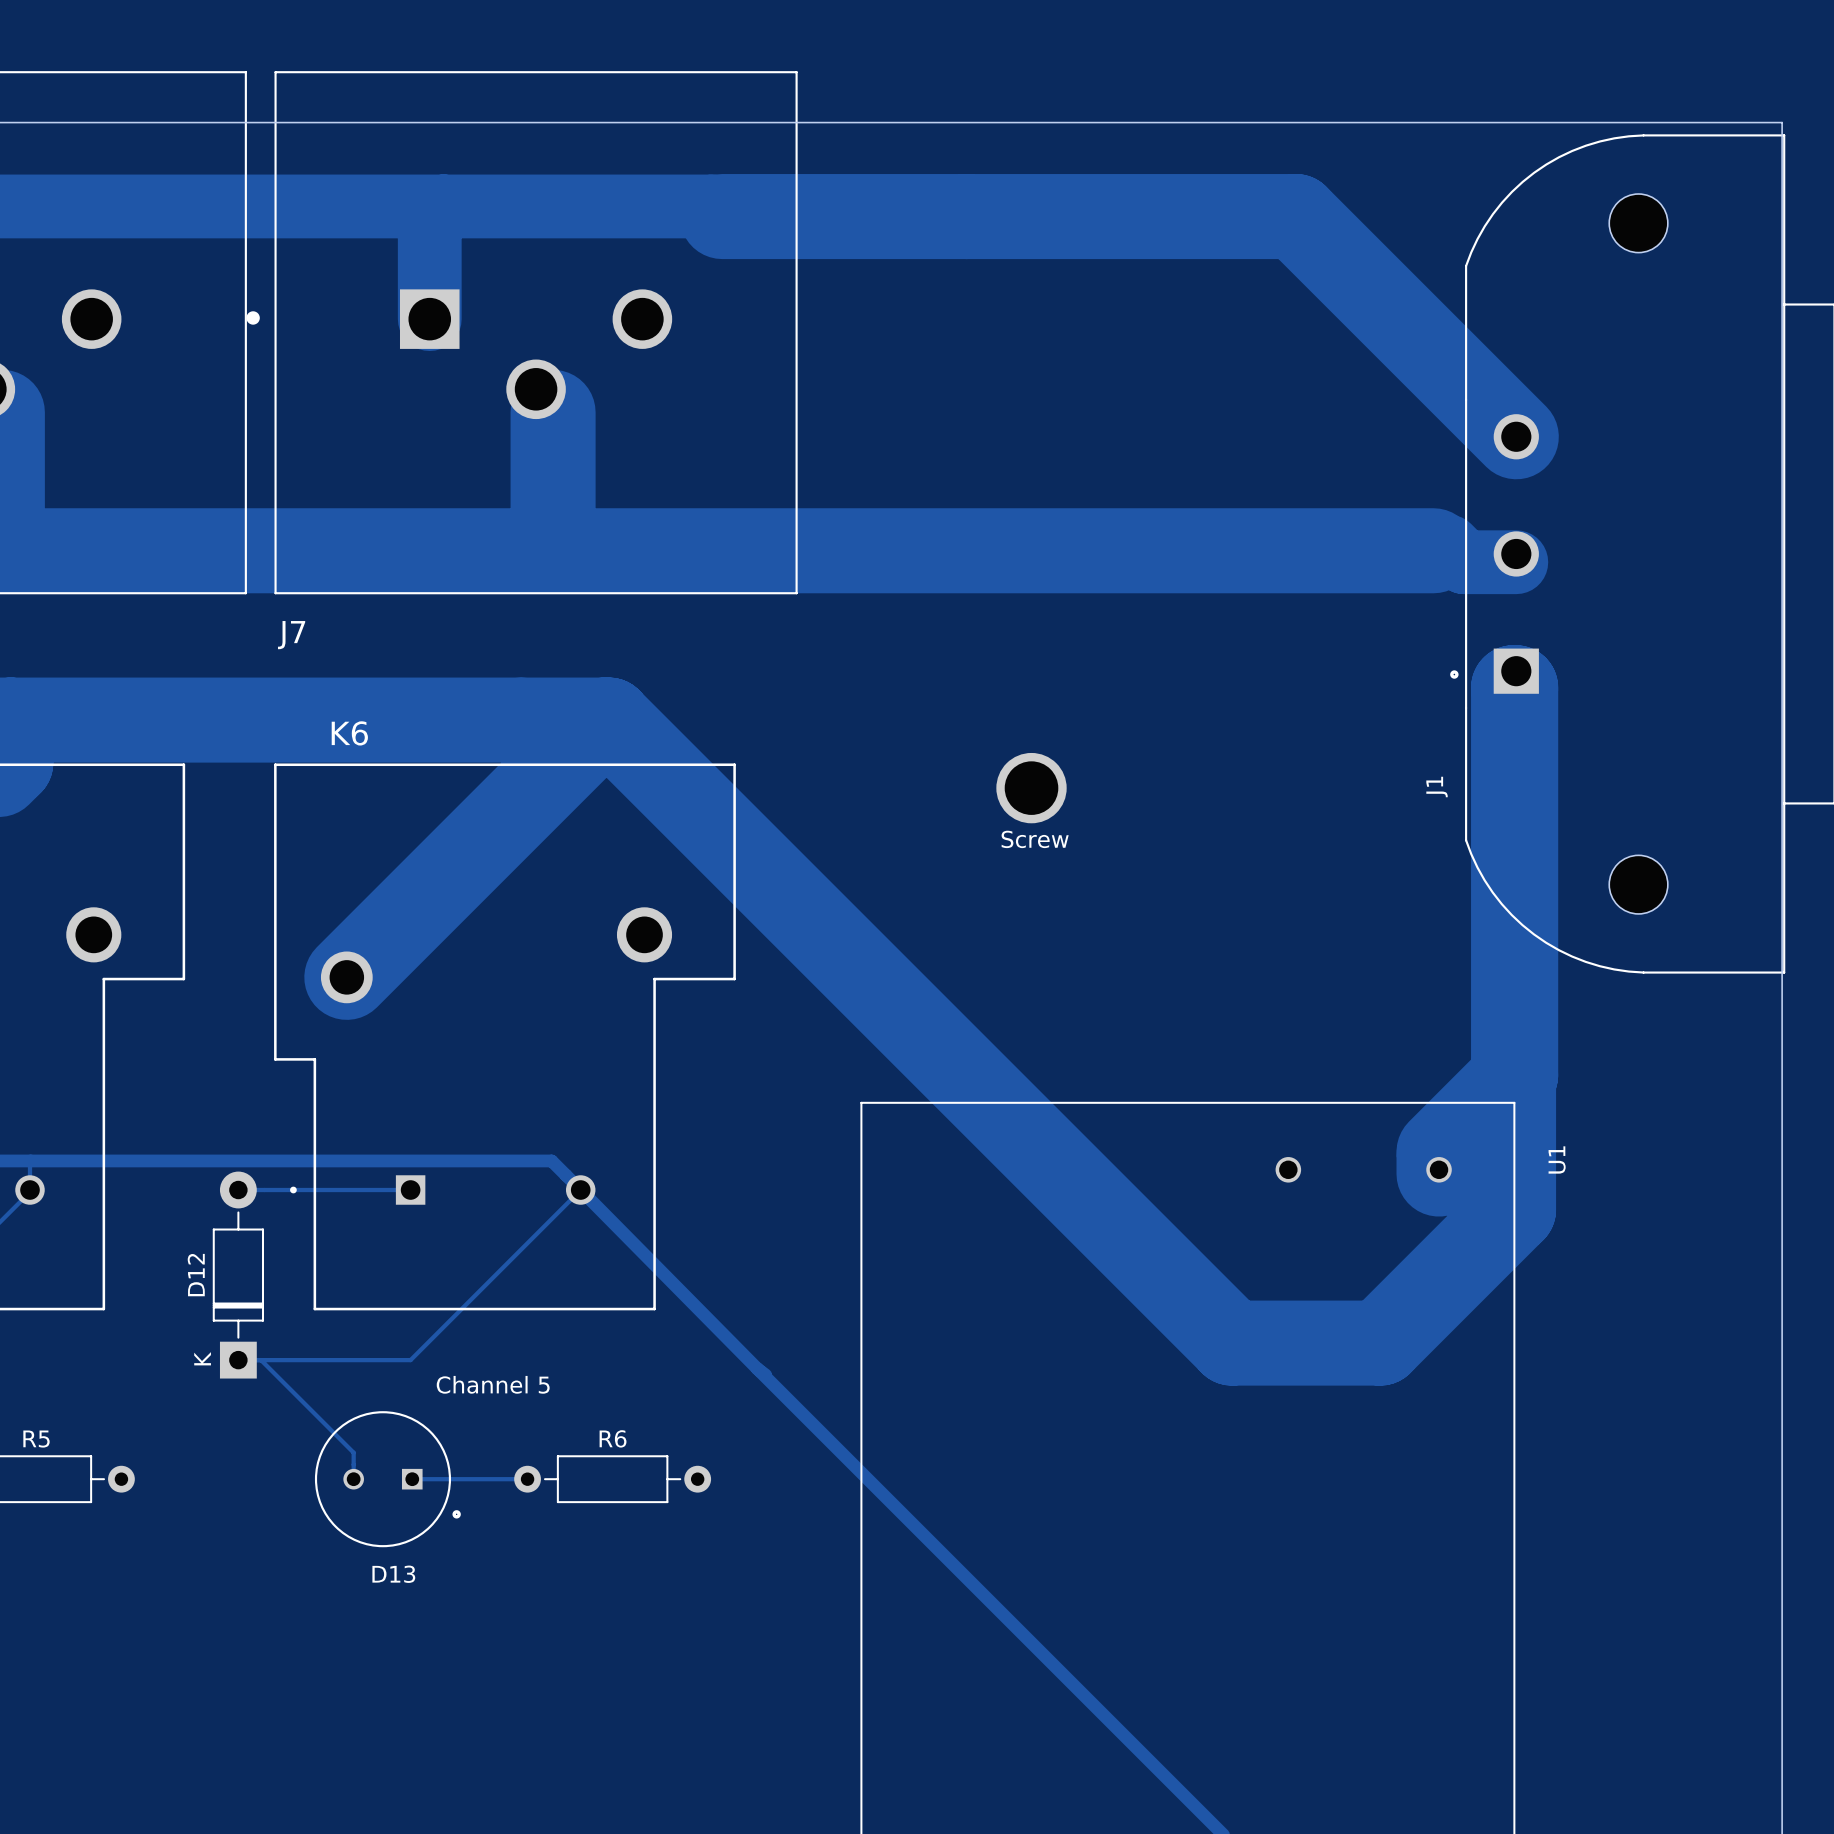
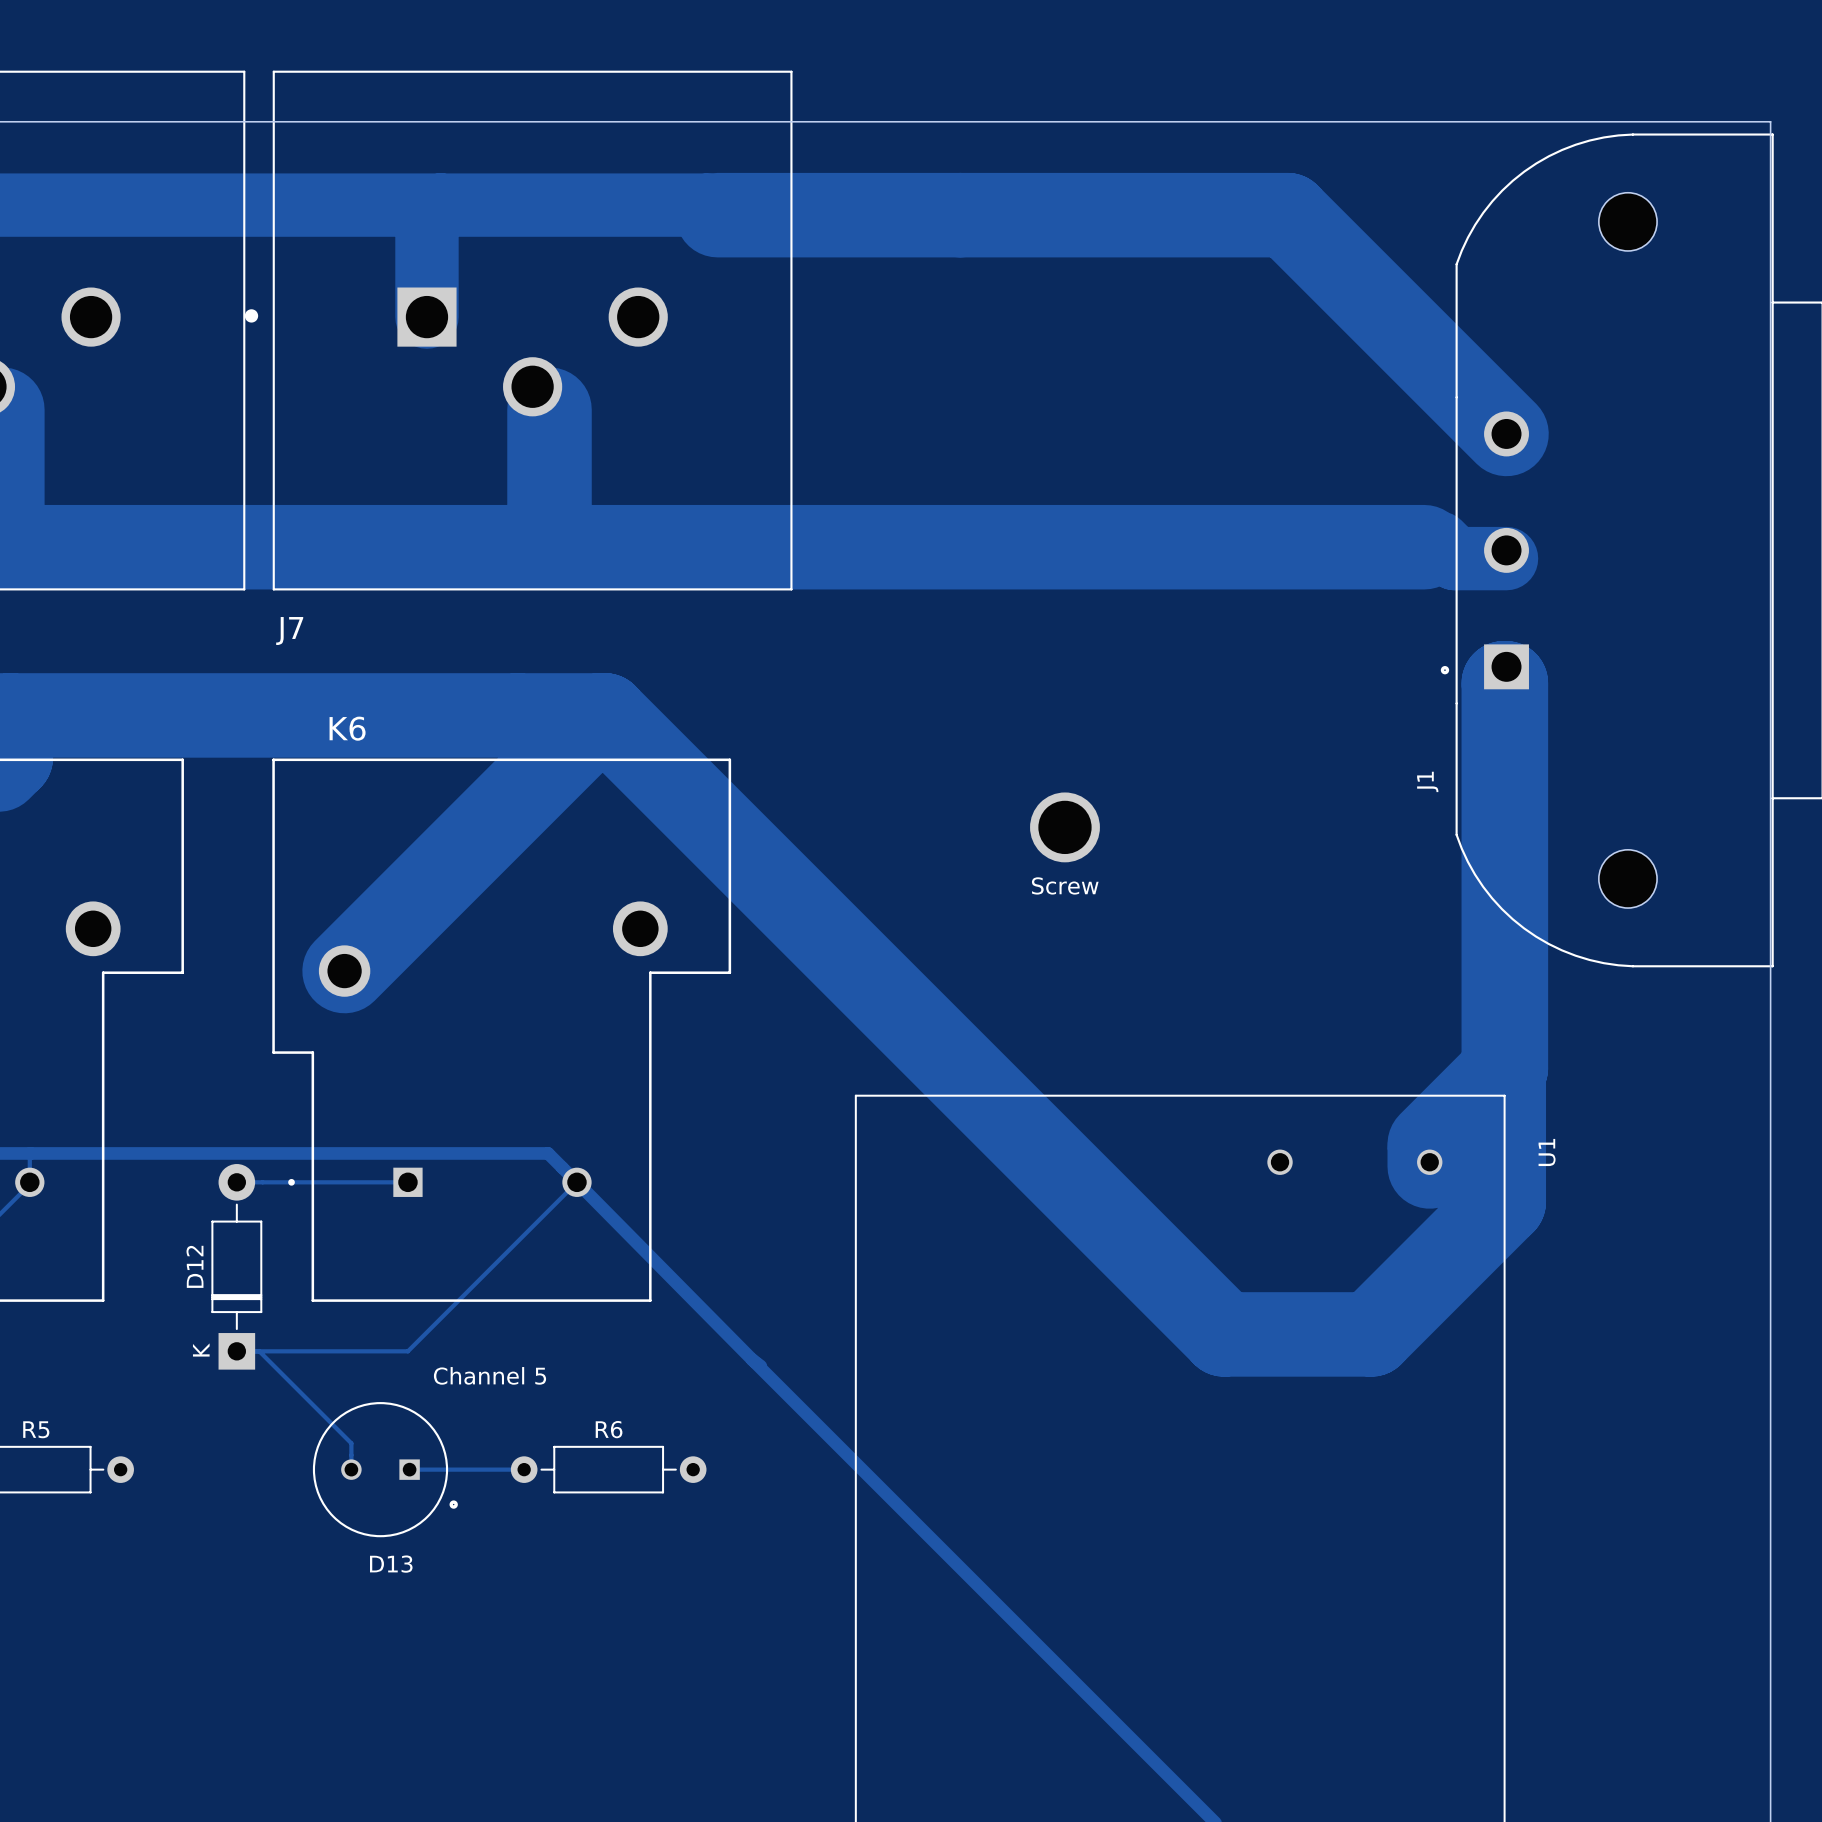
Screw position: (1031, 788) -> (1064, 827)
Screw name position: Screw (1035, 839) -> Screw (1065, 885)

